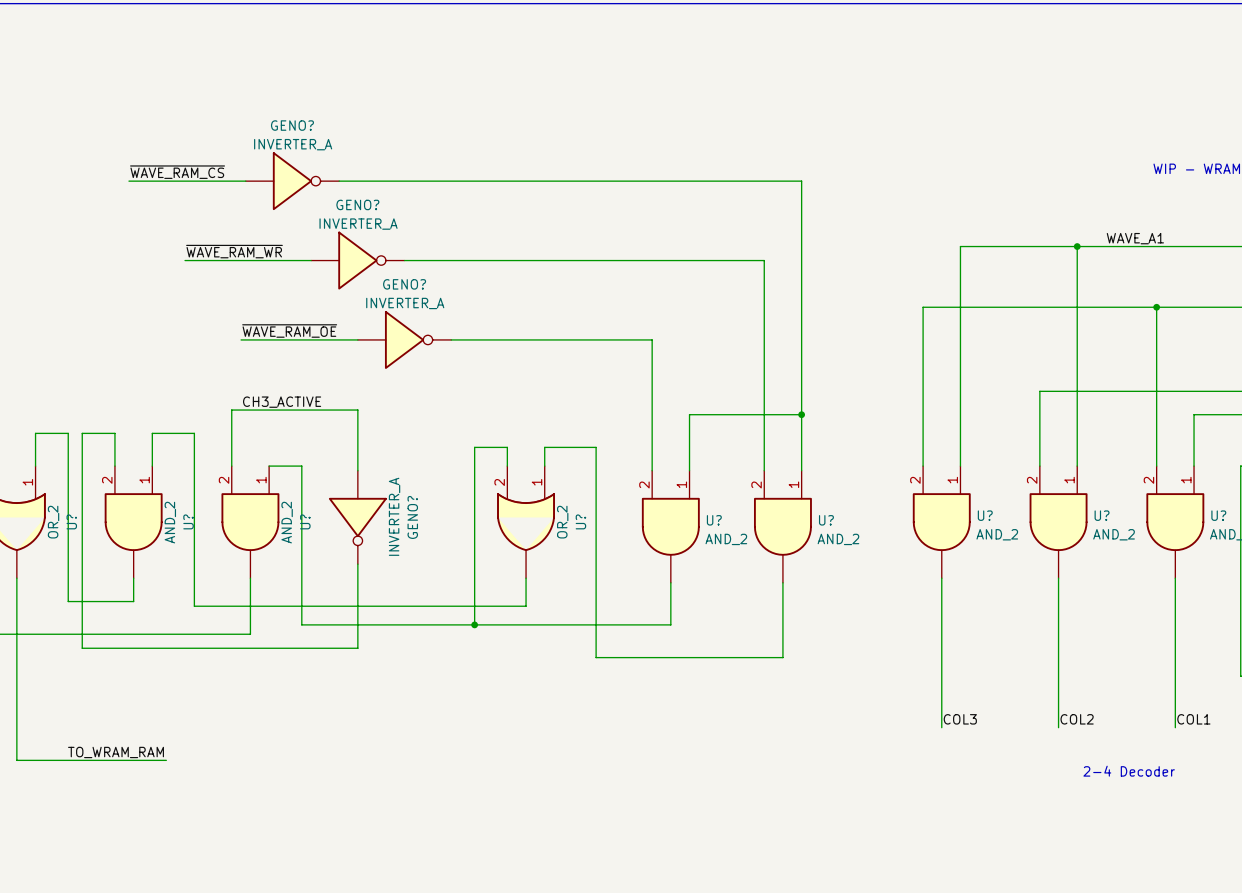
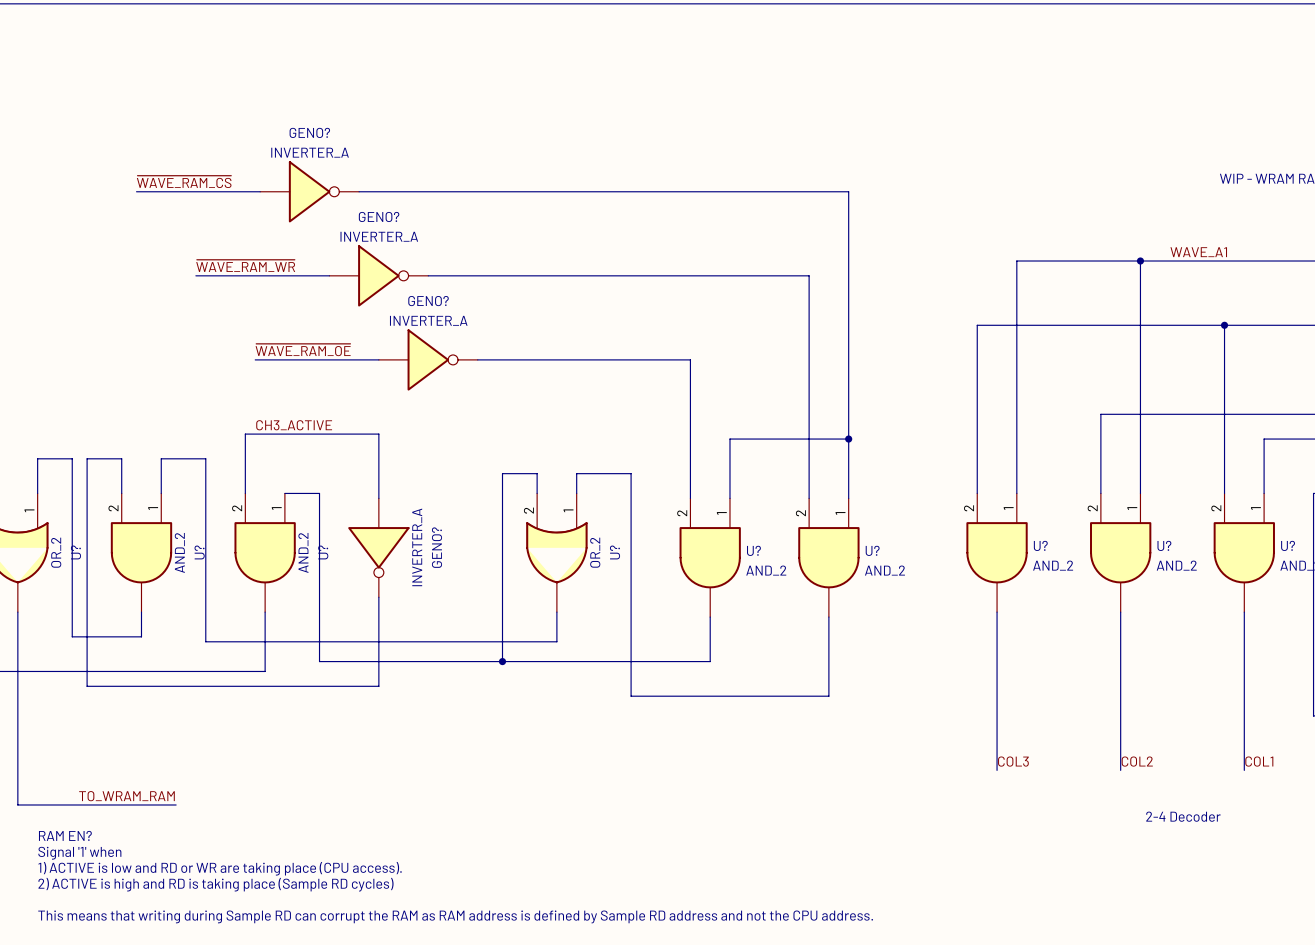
text: none -> RAM EN? (65, 835)
text: none -> Signal '1' when (79, 853)
text: none -> 1) ACTIVE is low and RD or WR are taking place (CPU access). (220, 868)
text: none -> 2) ACTIVE is high and RD is taking place (Sample RD cycles) (215, 884)
text: none -> This means that writing during Sample RD can corrupt the RAM as RAM address is defined by Sample RD address and not the CPU address. (455, 916)

